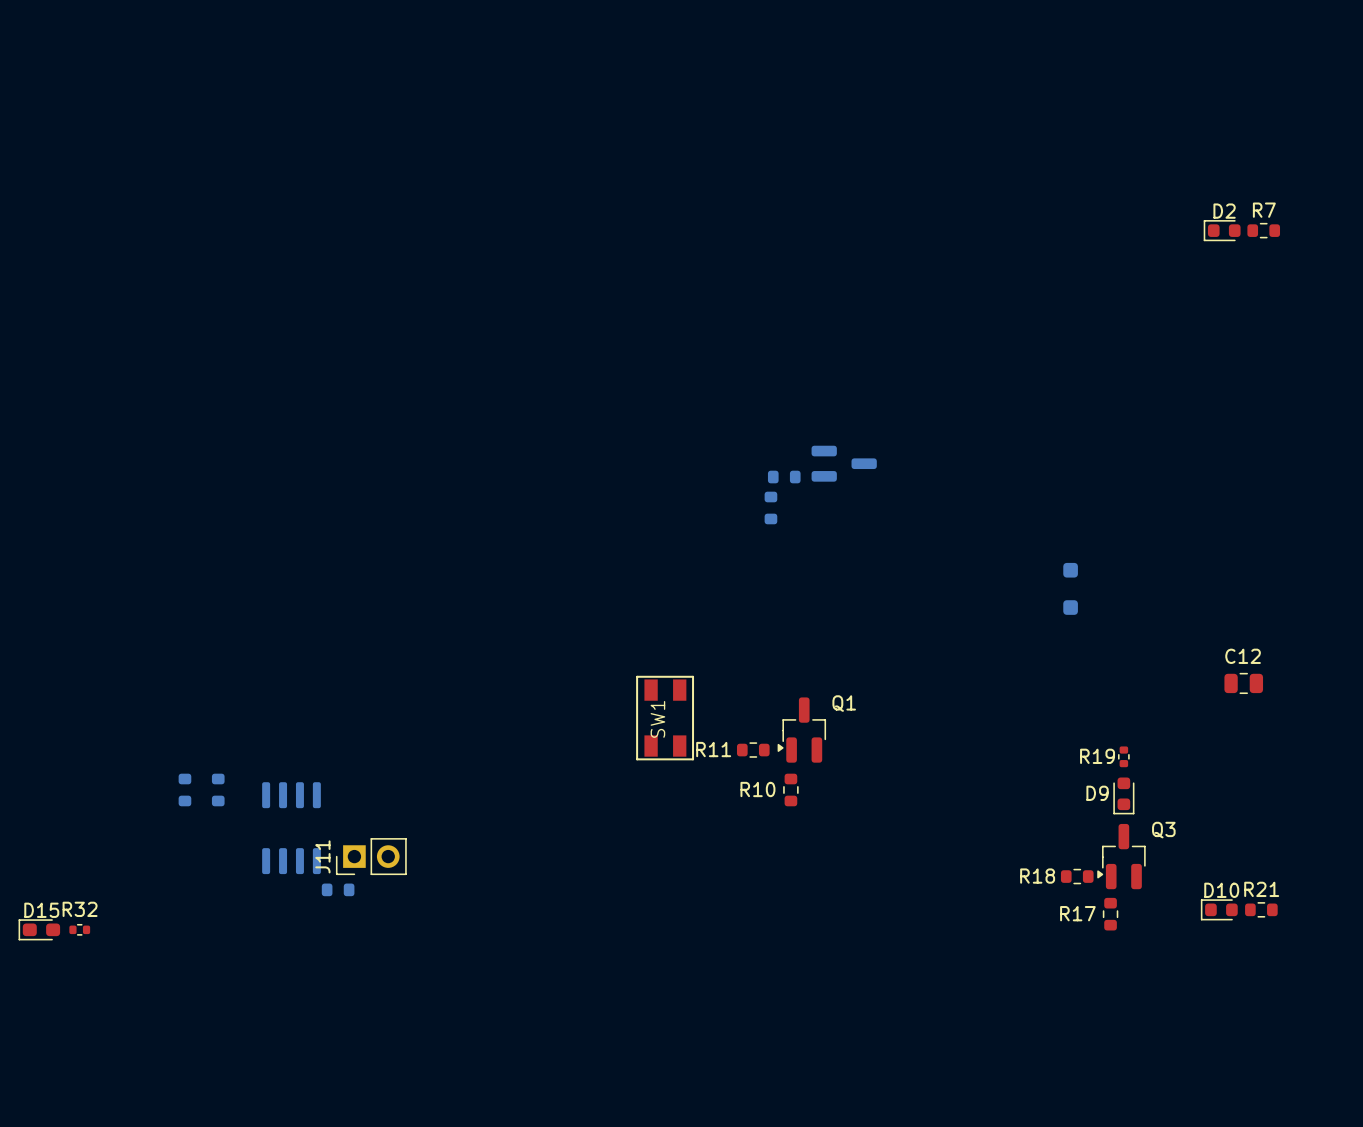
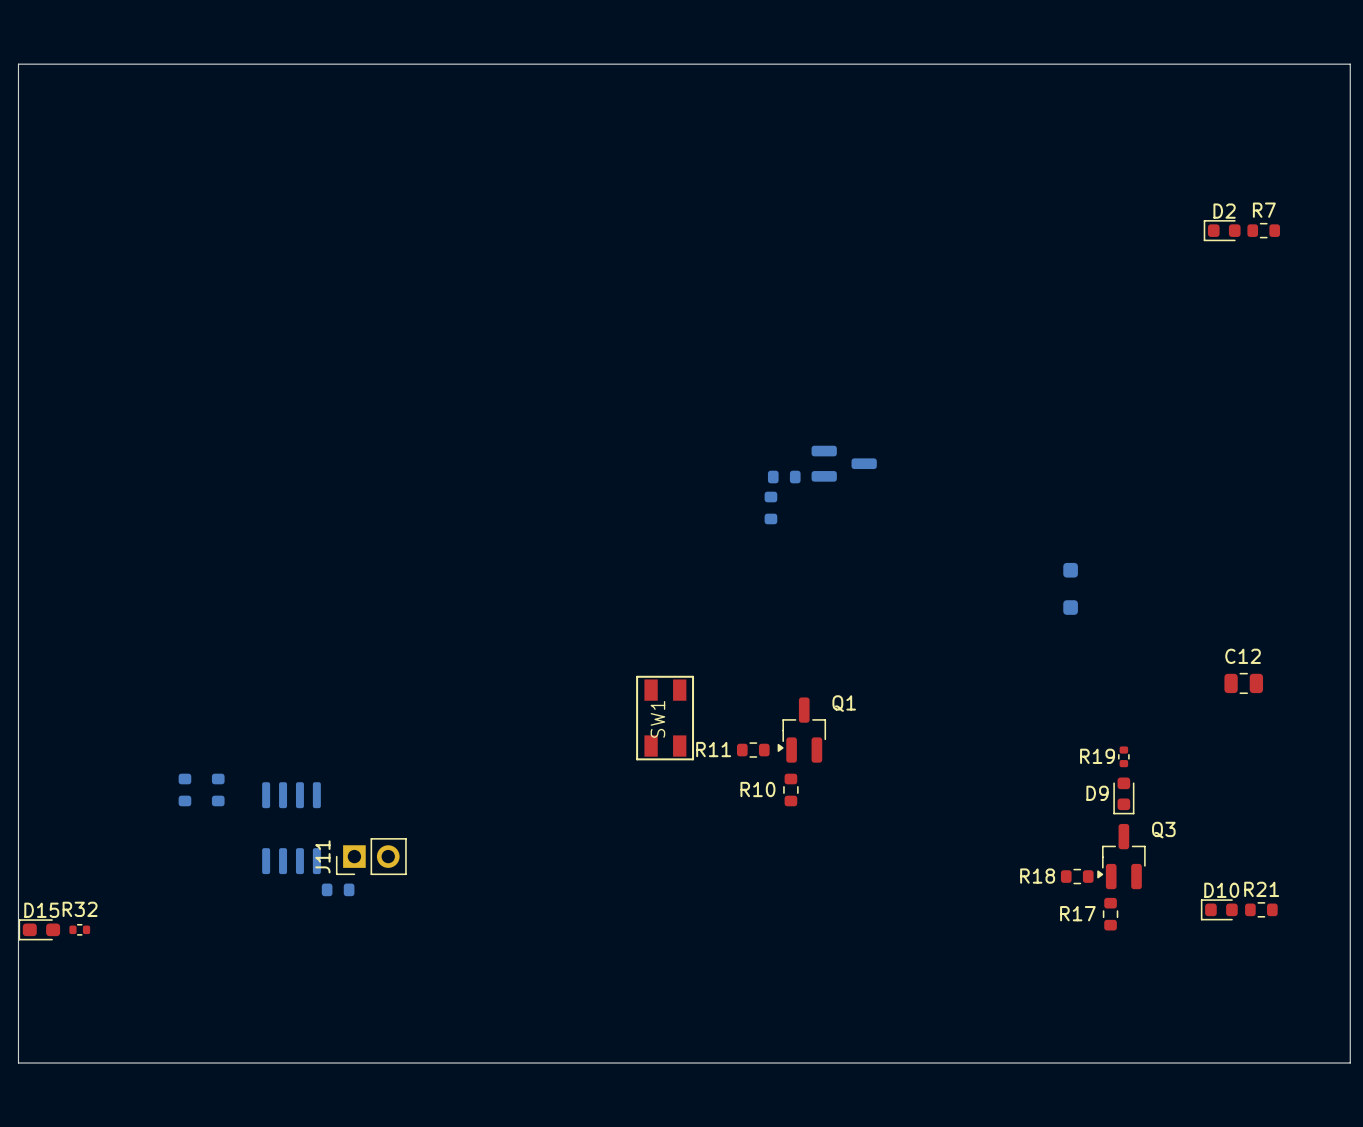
board edge: none -> (18, 64) (1350, 64) (1350, 1063) (18, 1063) (18, 64)

